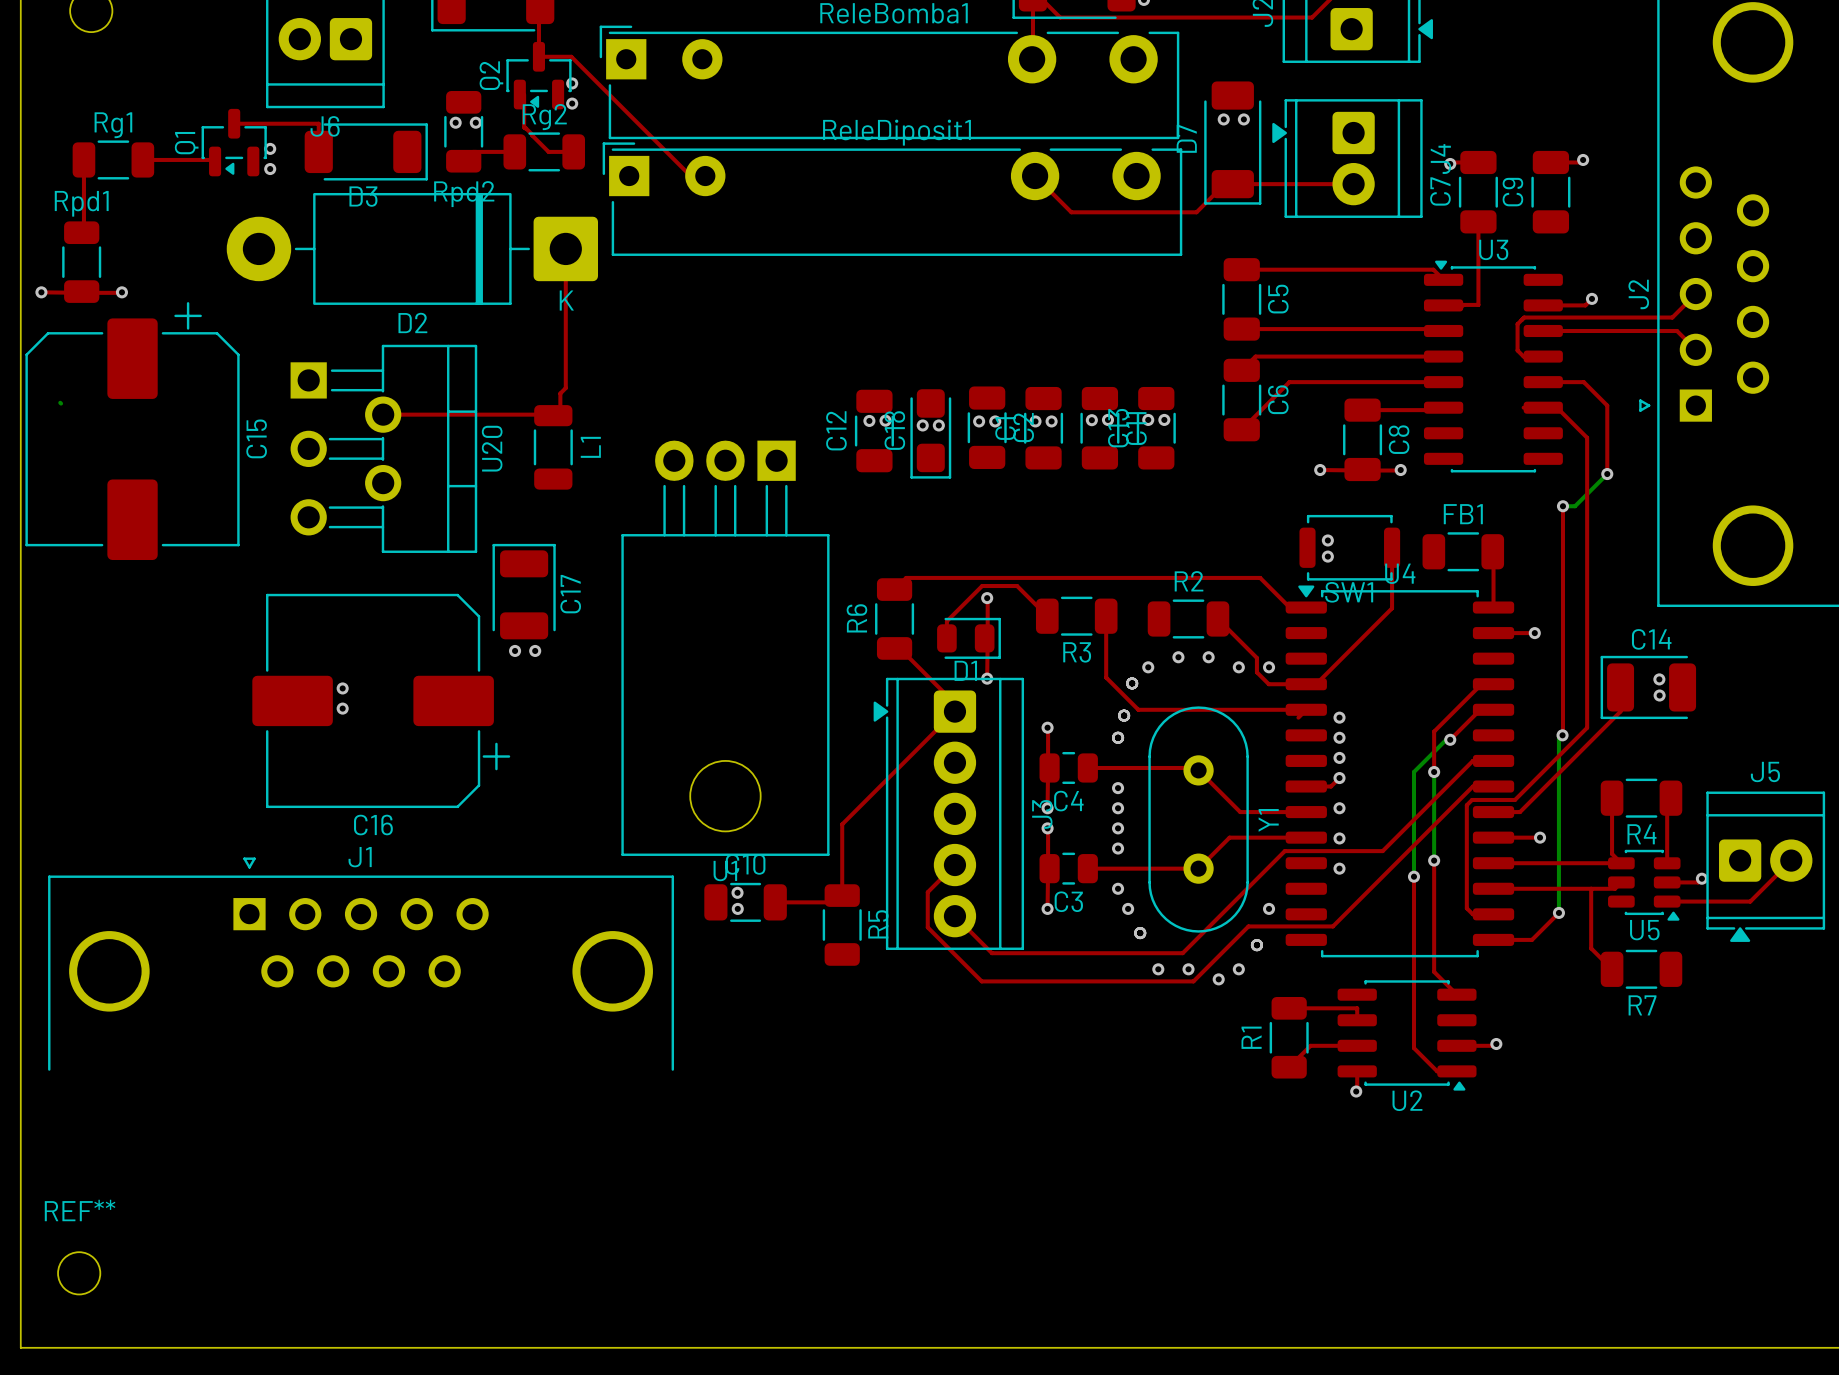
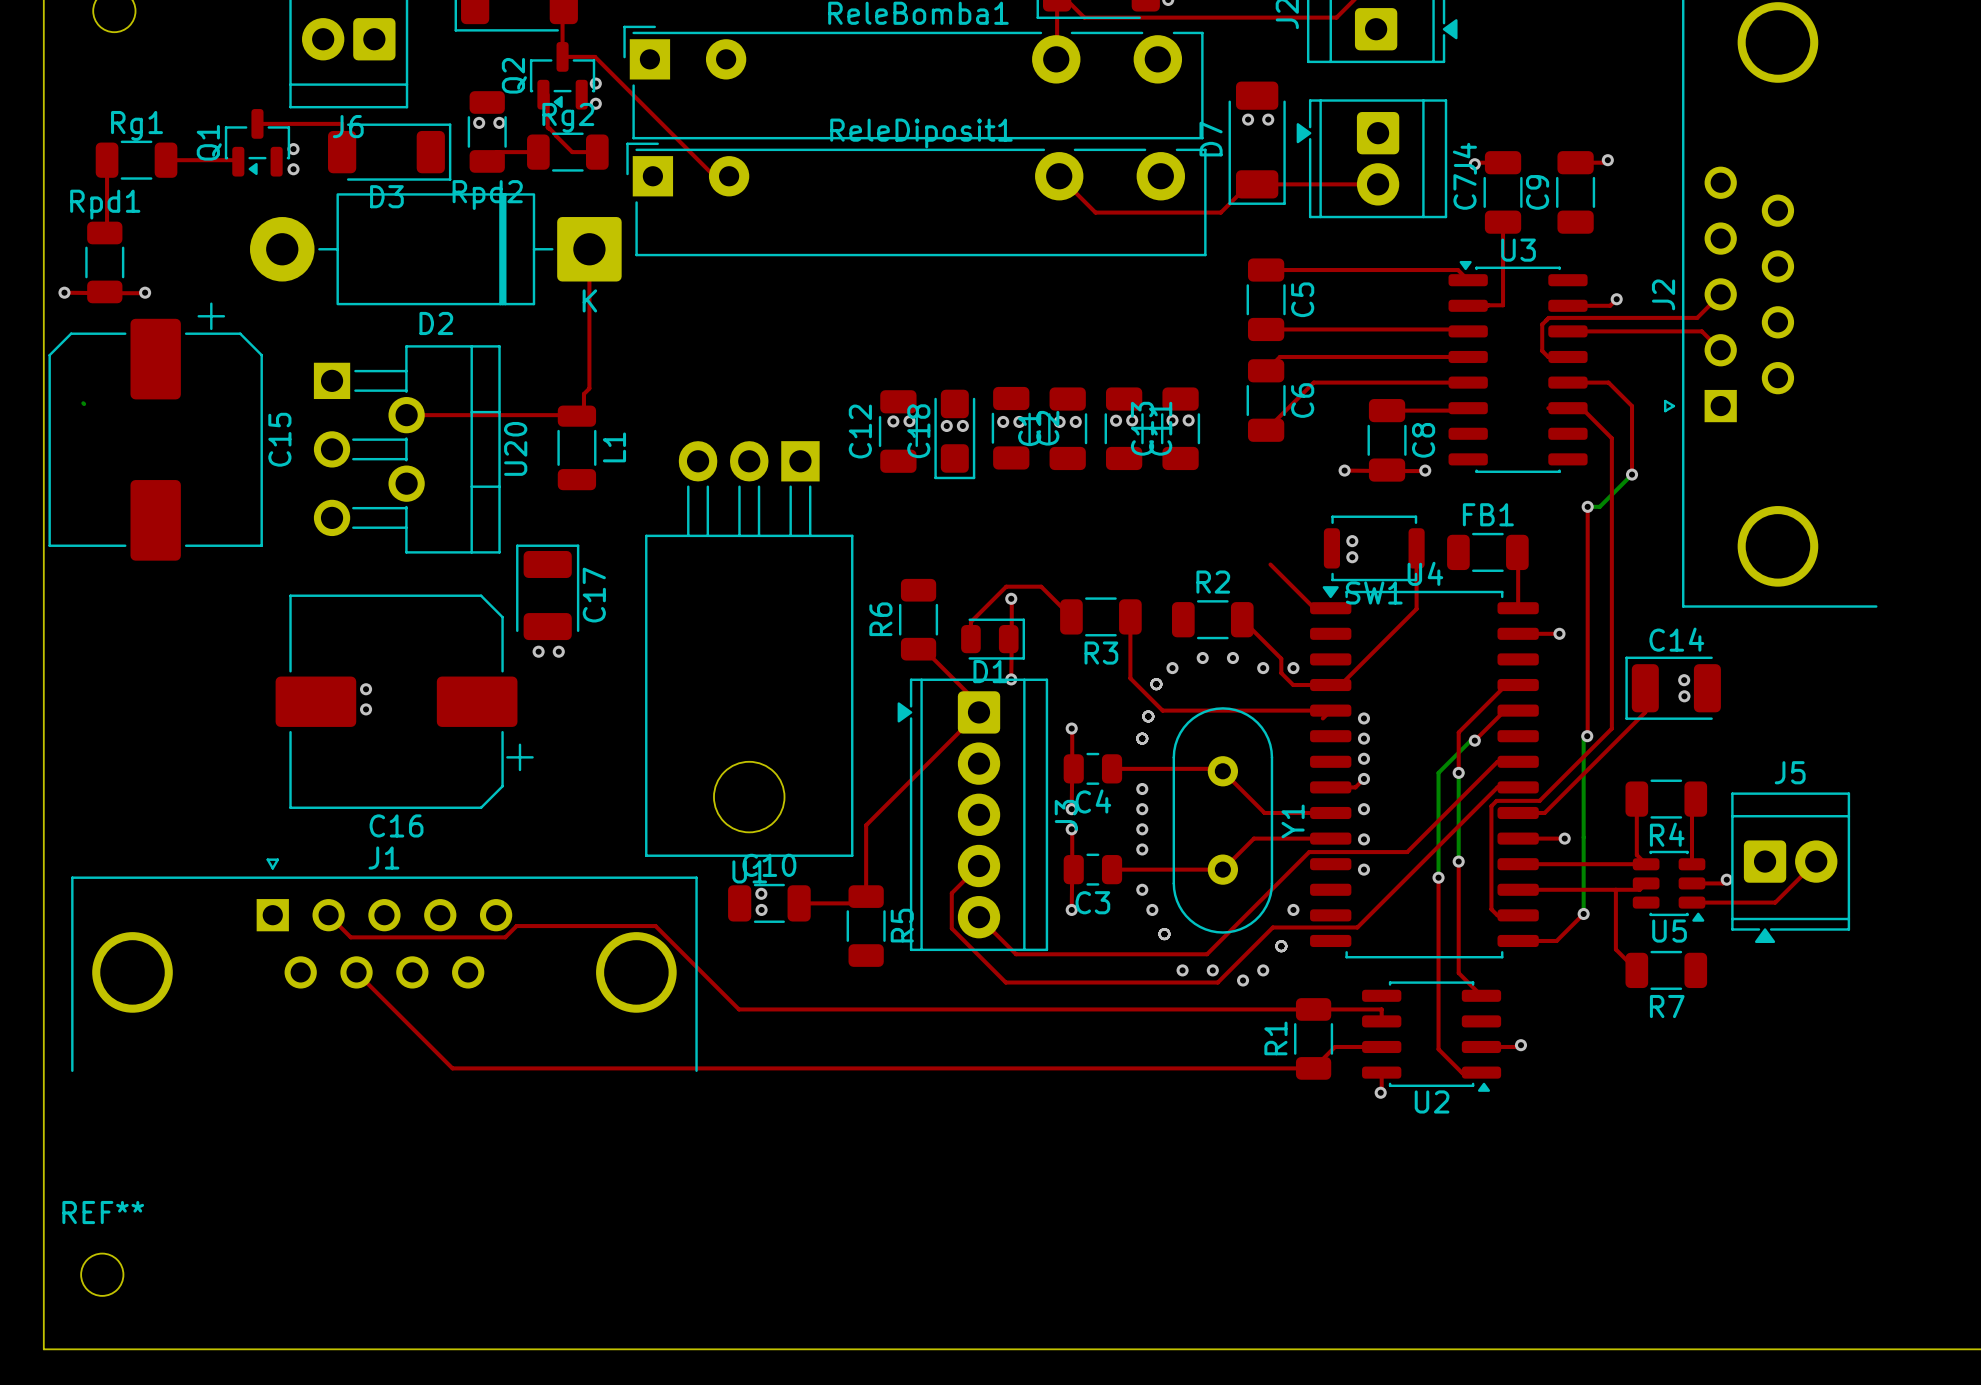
top track: (1260, 577) (906, 577) (894, 589) -> (1284, 578) (1270, 564)
top track: none -> (328, 915) (350, 937) (505, 937) (516, 926) (655, 926) (739, 1009) (1313, 1009)
top track: none -> (356, 972) (452, 1068) (1313, 1068)

